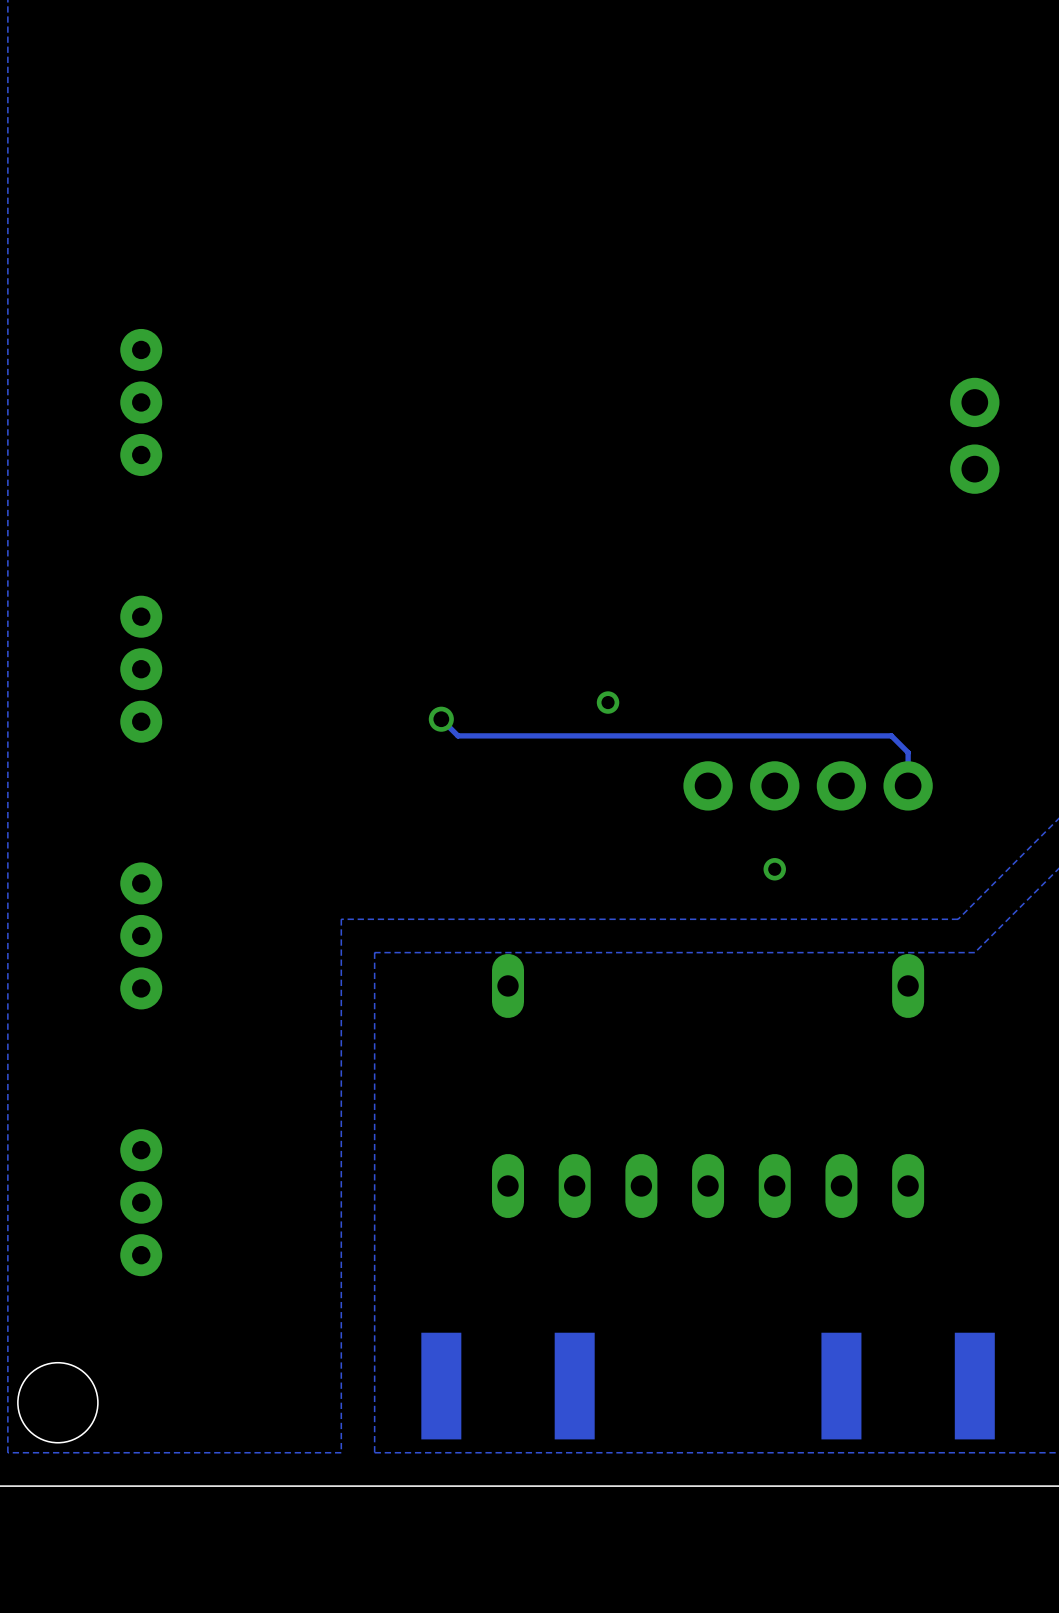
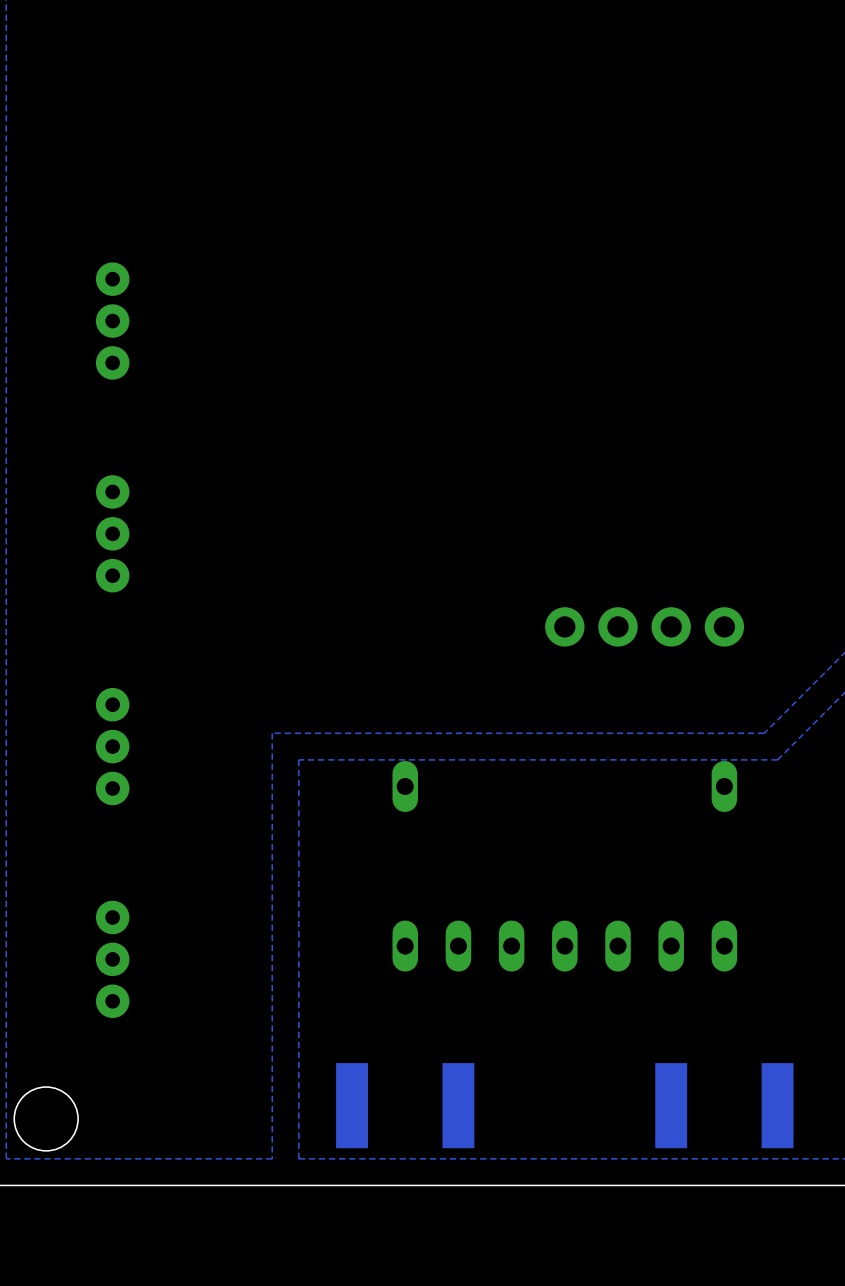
part: (974, 435) -> none
via: (608, 702) -> none
track: (441, 719) (458, 735) (891, 735) (908, 752) (908, 785) -> none
via: (441, 719) -> none
via: (774, 869) -> none

